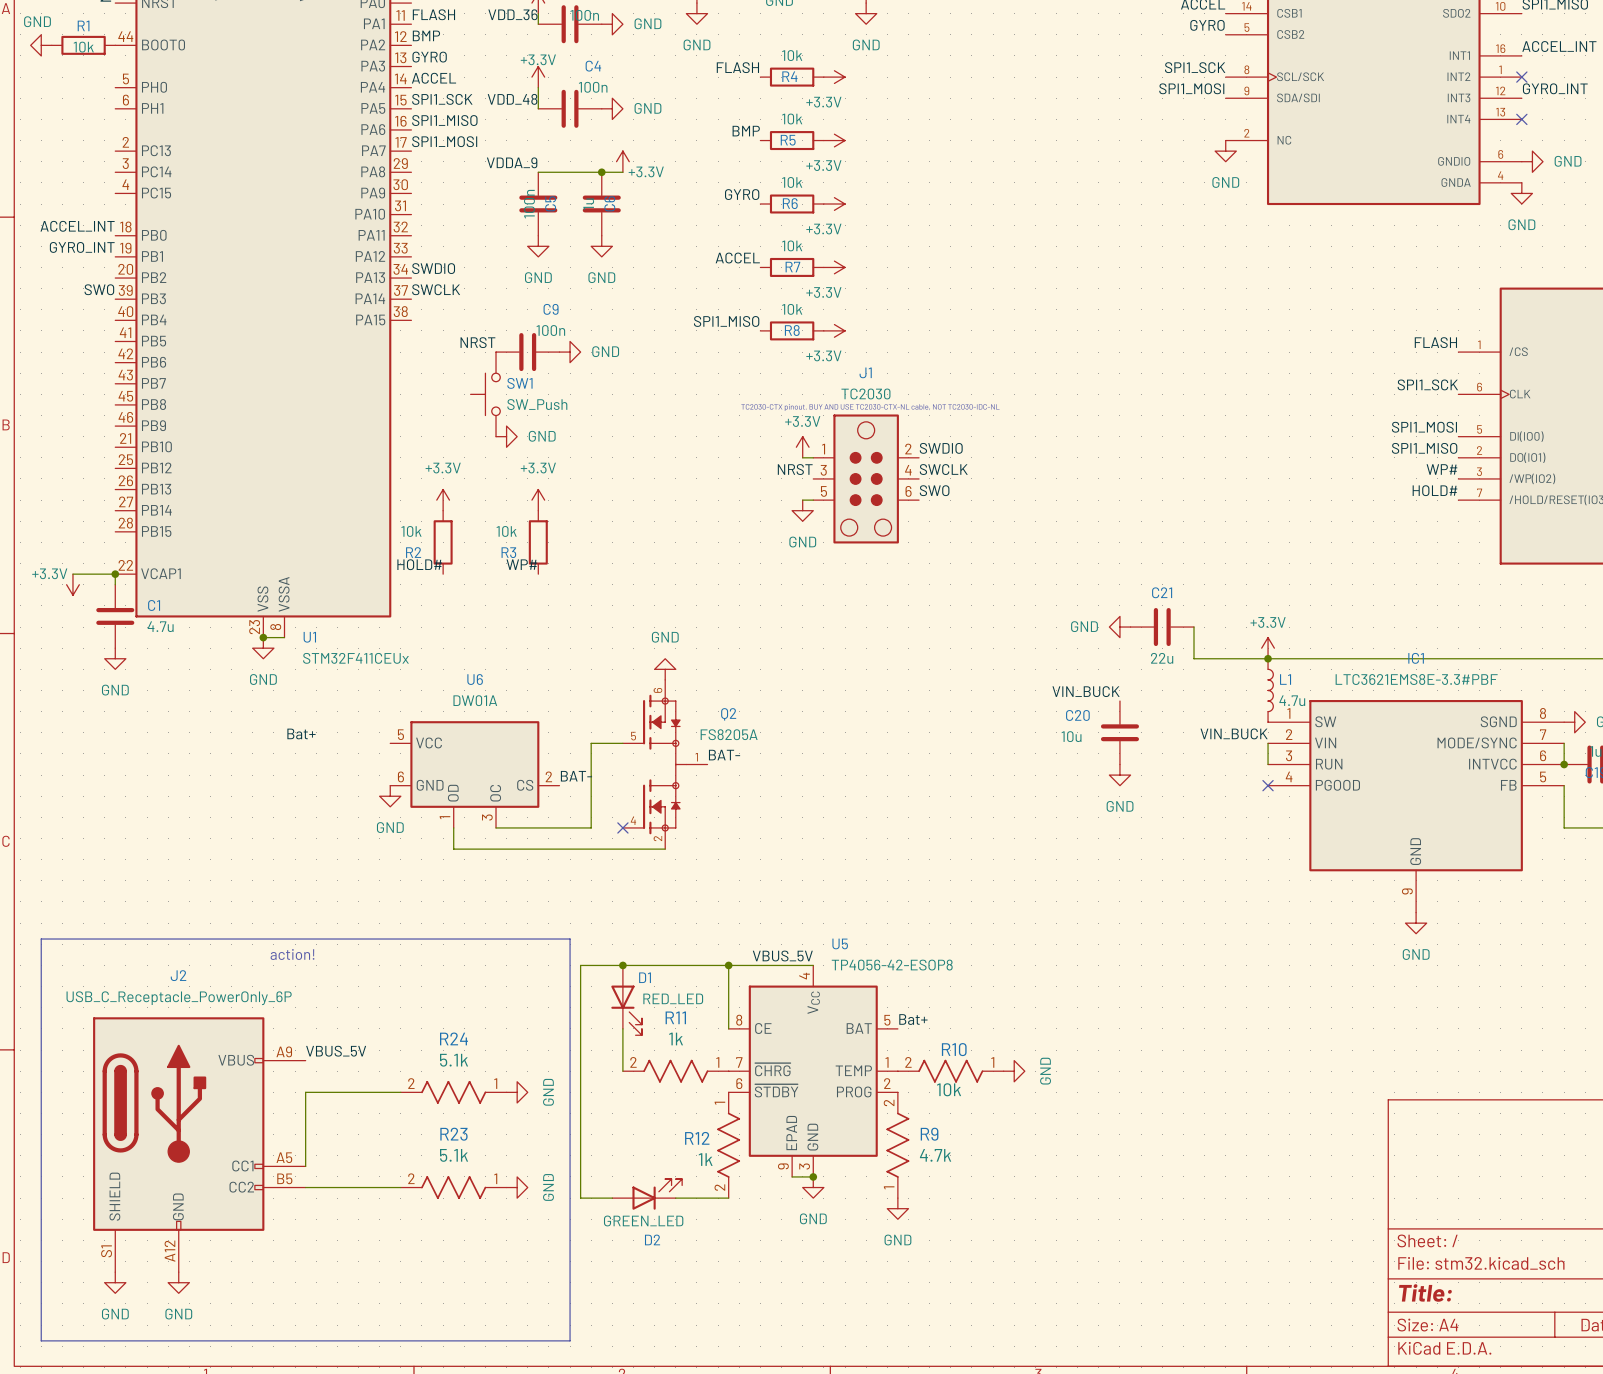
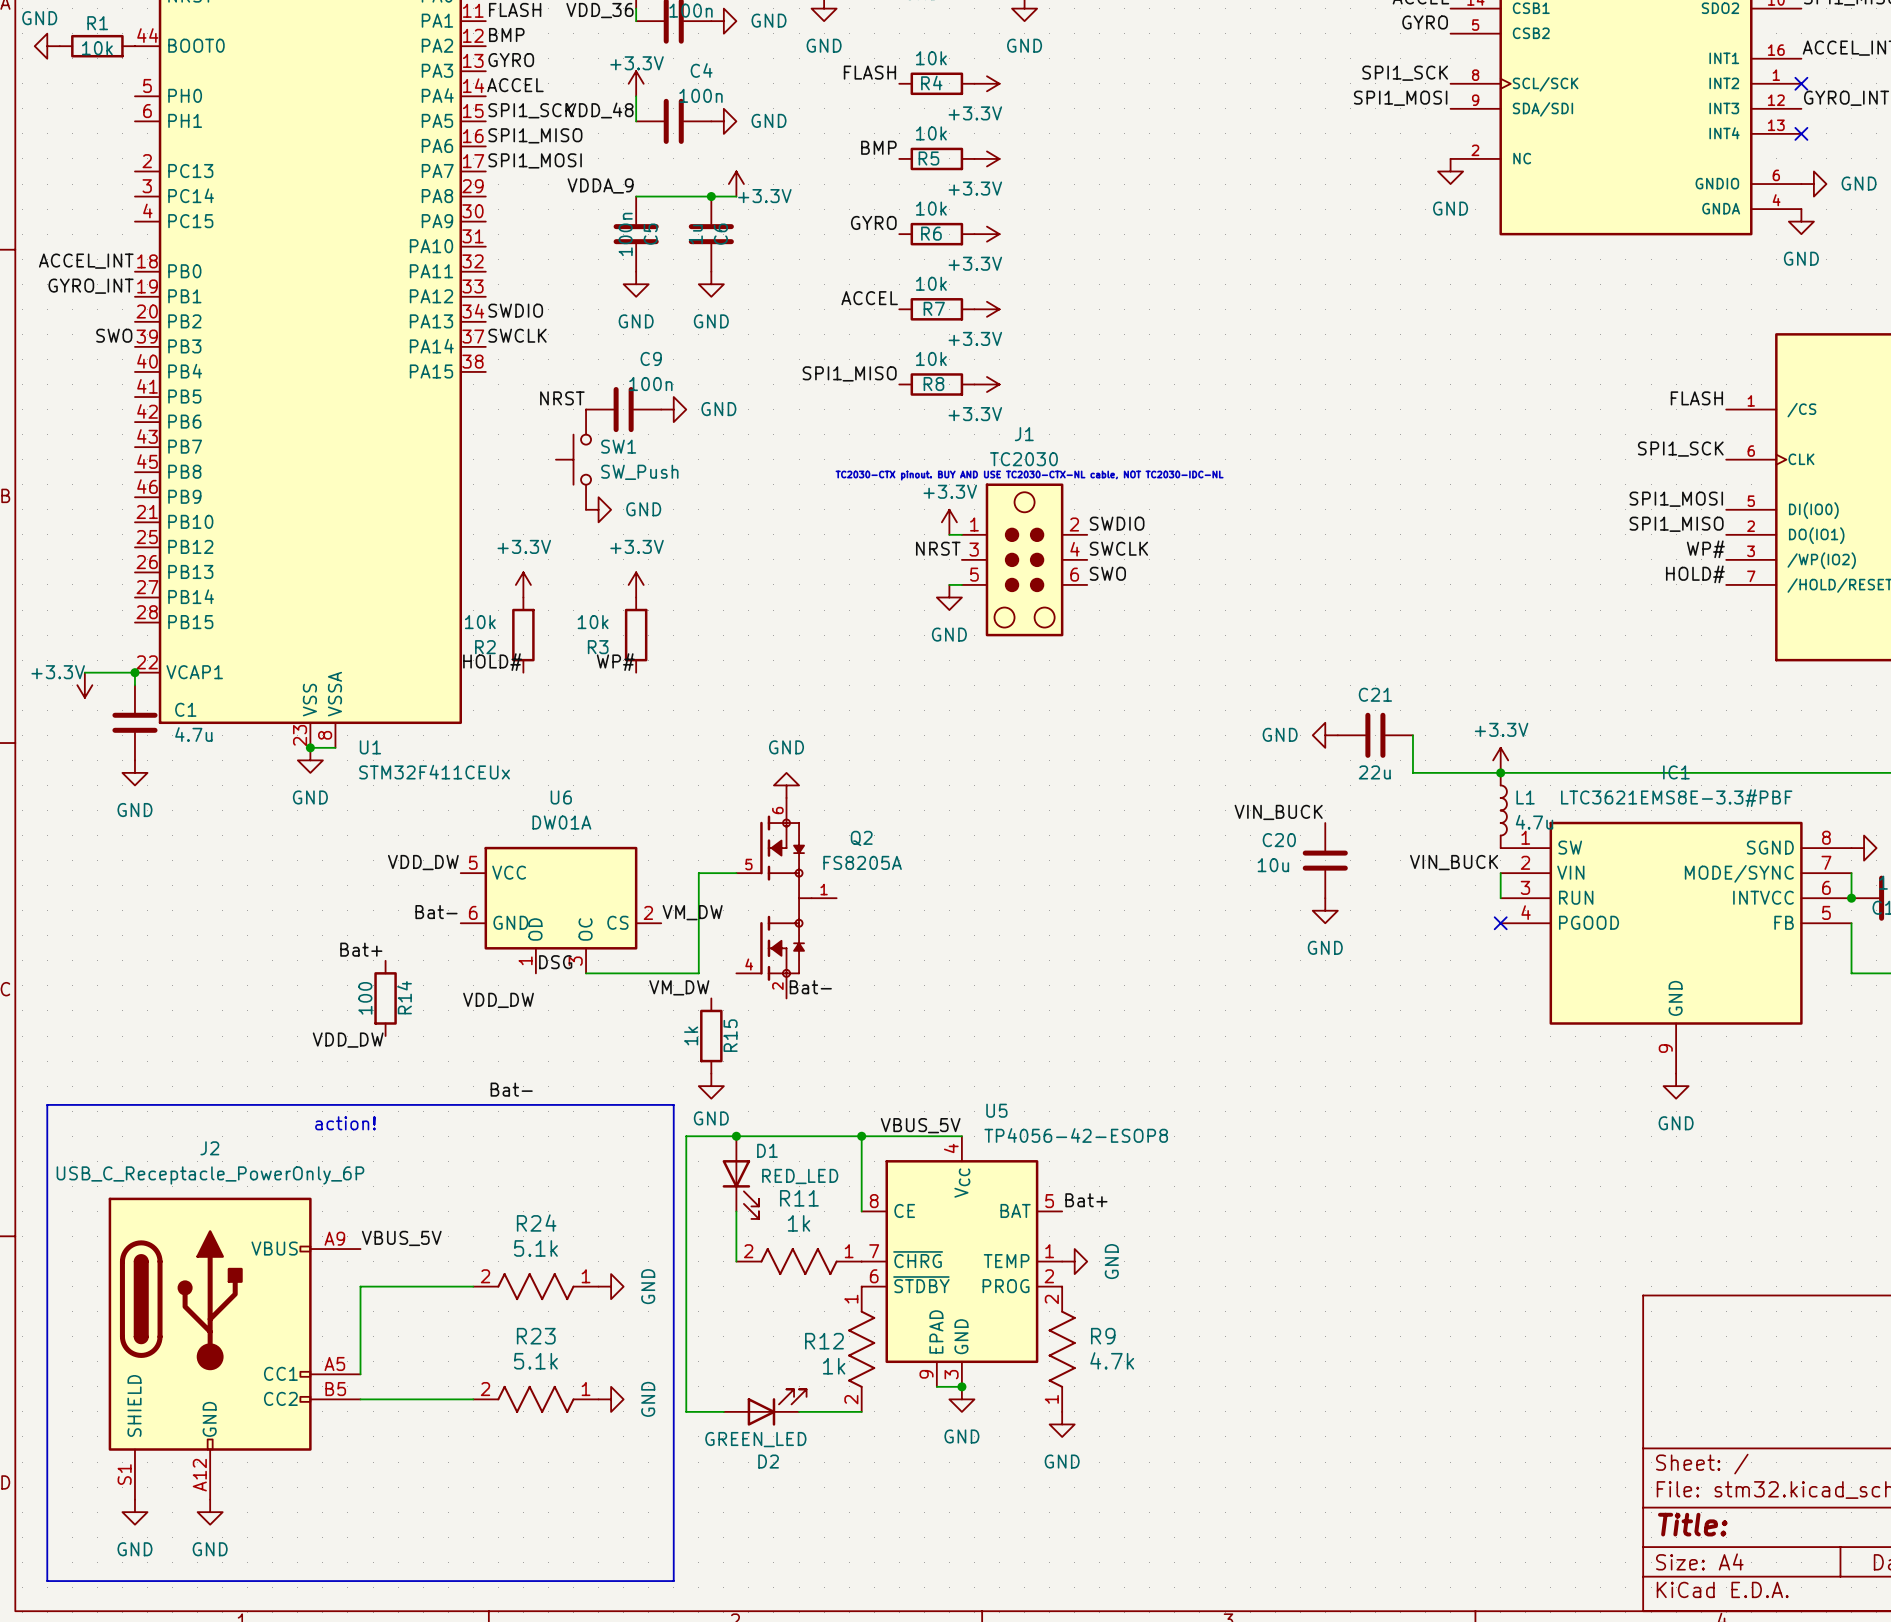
label position: Bat+ (301, 733) -> Bat+ (361, 949)
label: none -> VDD_DW (423, 862)
label: BAT- (724, 755) -> none
label: none -> Bat- (436, 912)
label: BAT- (576, 776) -> VM_DW (692, 912)
power symbol: GND (390, 796) -> none
label: none -> DSG (555, 962)
wire: (453, 827) (453, 849) (665, 849) -> none
no-connect mark: (622, 827) -> none
label: none -> VM_DW (679, 987)
label: none -> Bat- (810, 987)
R14: none -> 100 (385, 998)
label: none -> VDD_DW (498, 1000)
R15: none -> 1k (711, 1036)
label: none -> VDD_DW (348, 1040)
power symbol: none -> GND (711, 1086)
label: none -> Bat- (511, 1089)
R10: 10k (950, 1071) -> none
power symbol position: GND (1014, 1071) -> GND (1074, 1261)

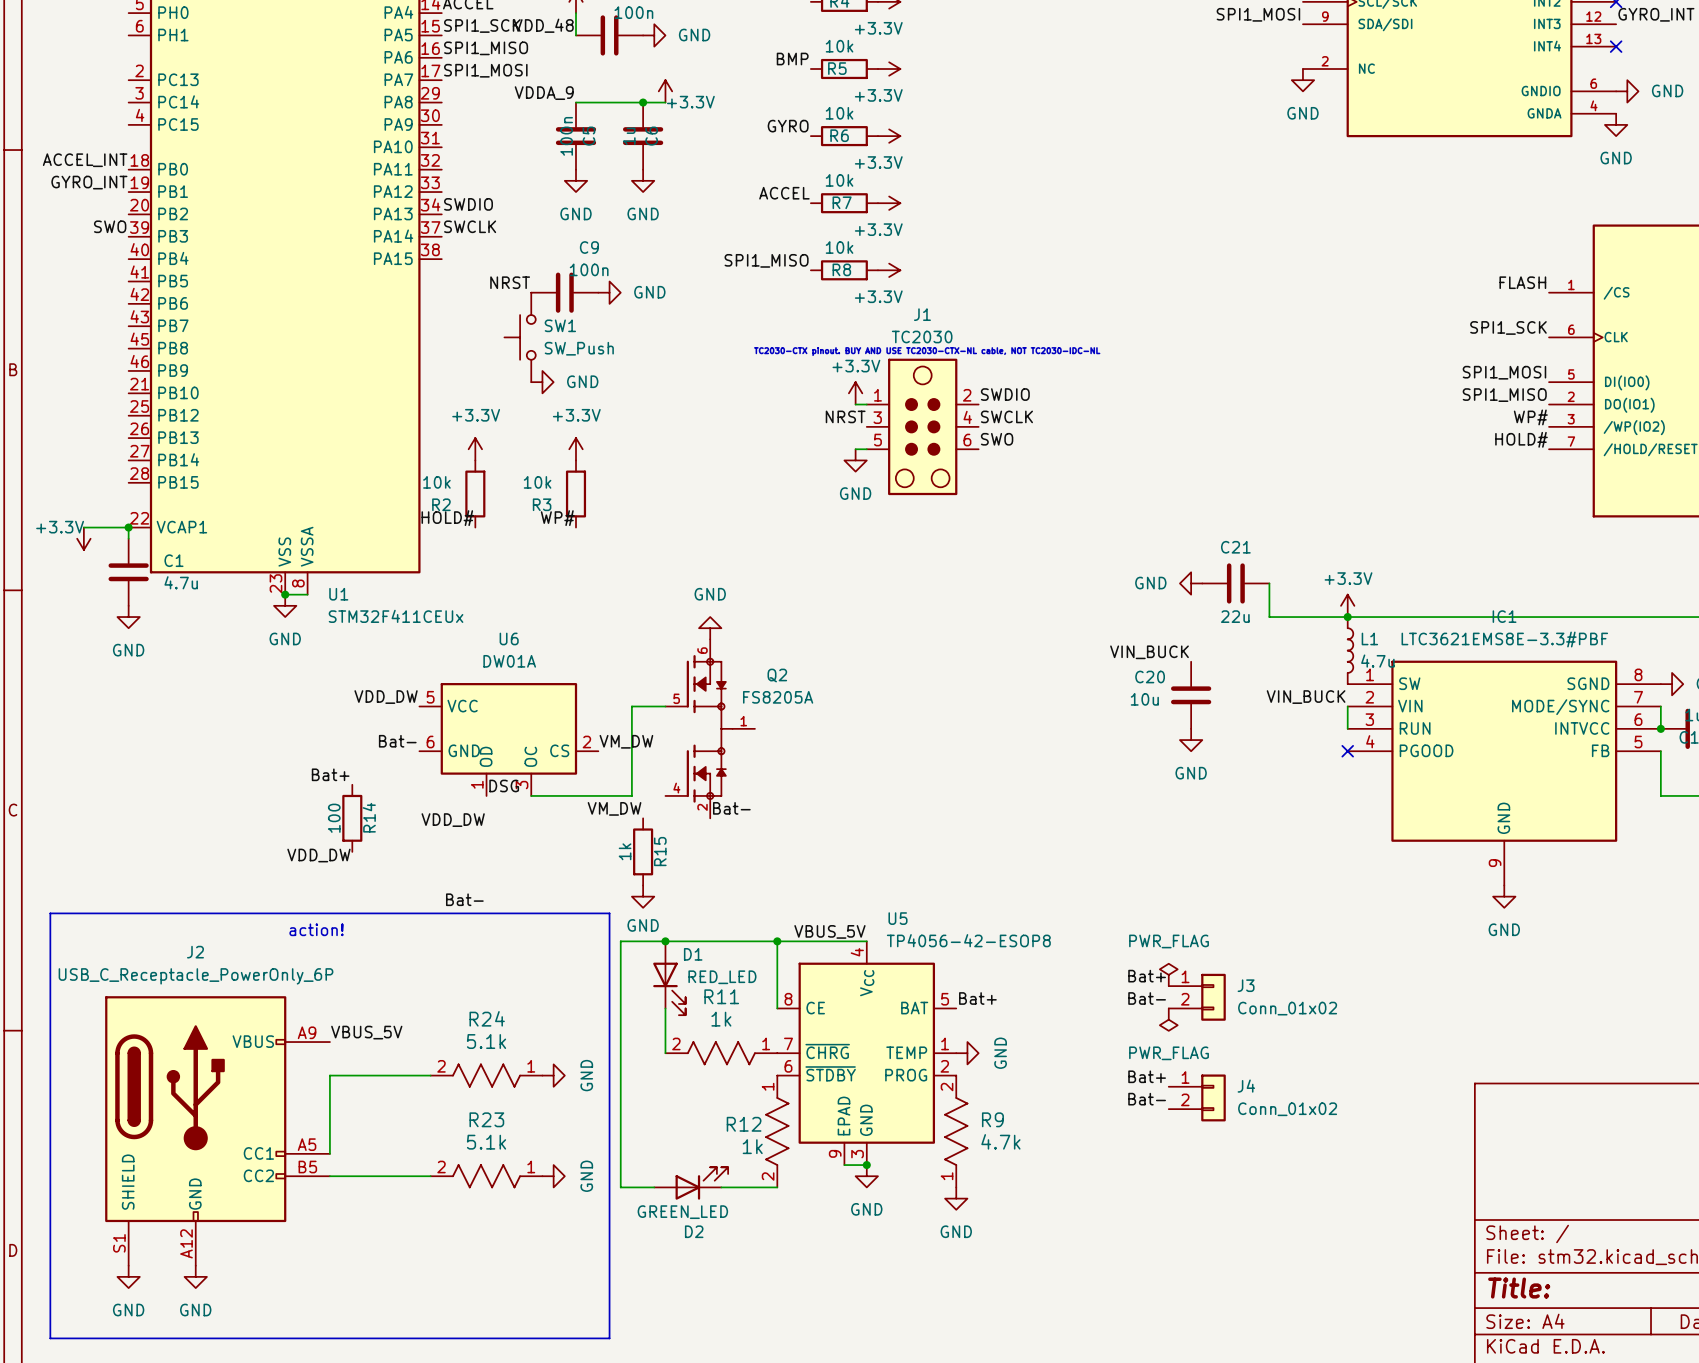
power symbol: none -> PWR_FLAG (1168, 974)
label: none -> Bat+ (1147, 976)
J3: none -> Conn_01x02 (1197, 997)
label: none -> Bat- (1147, 998)
power symbol: none -> PWR_FLAG (1168, 1019)
label: none -> Bat+ (1147, 1076)
J4: none -> Conn_01x02 (1197, 1097)
label: none -> Bat- (1147, 1099)

